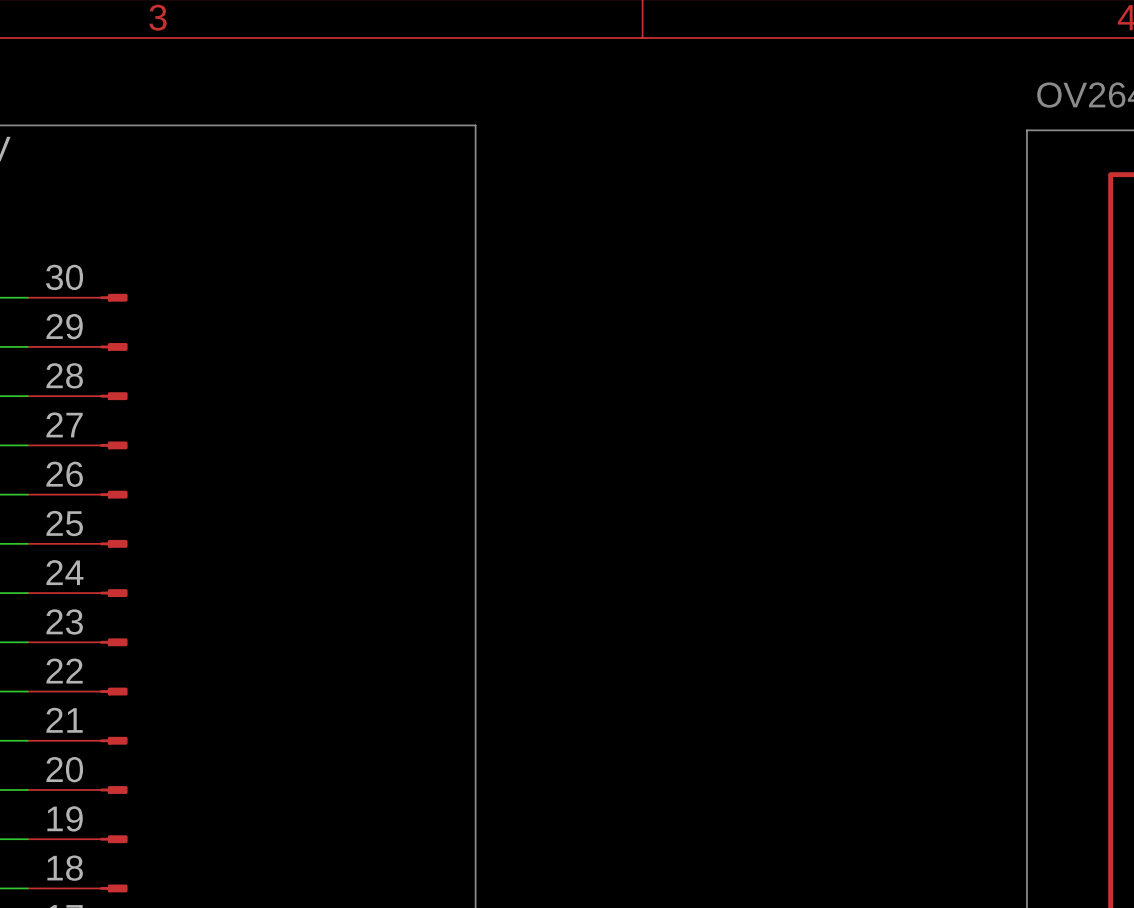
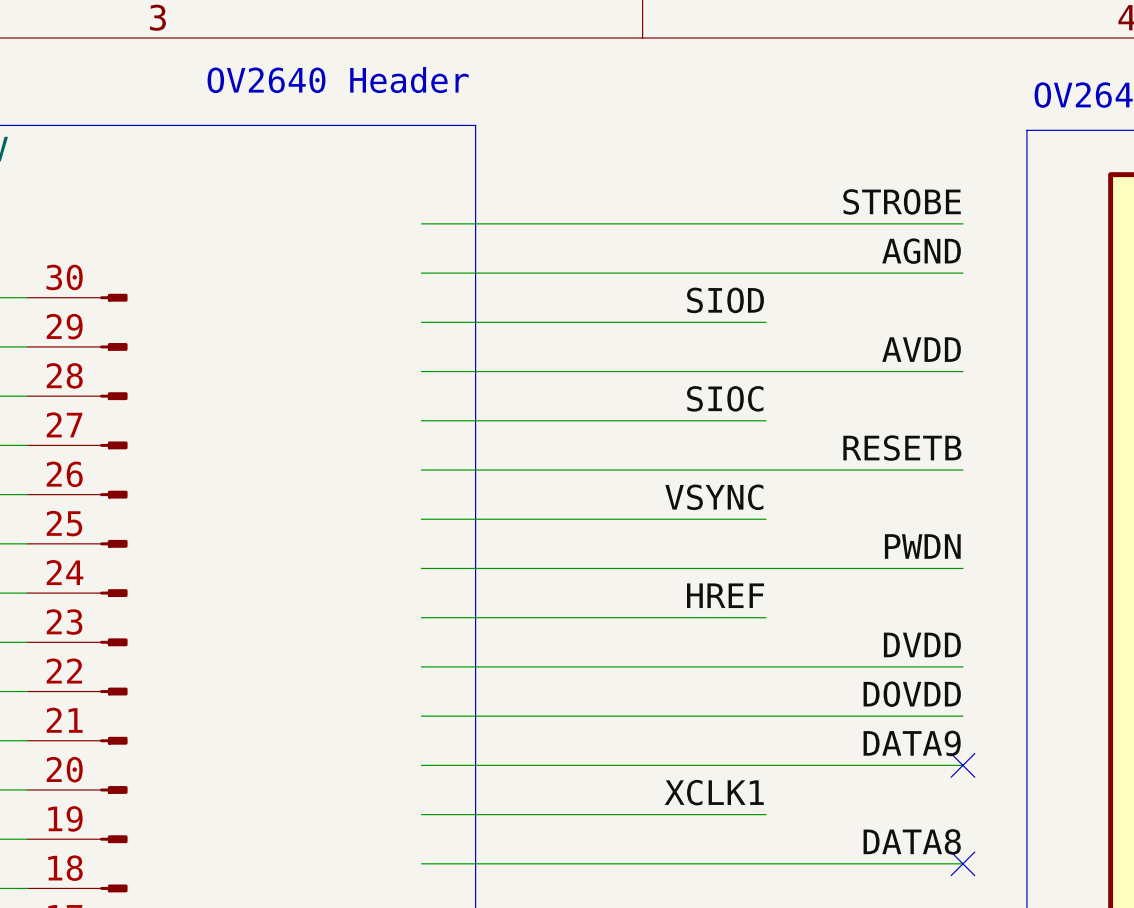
text: none -> OV2640 Header (338, 79)
label: none -> STROBE (902, 201)
wire: none -> (421, 223) (962, 223)
label: none -> AGND (921, 251)
wire: none -> (421, 273) (962, 273)
label: none -> SIOD (725, 300)
wire: none -> (421, 322) (766, 322)
label: none -> AVDD (921, 349)
wire: none -> (421, 371) (962, 371)
label: none -> SIOC (725, 398)
wire: none -> (421, 420) (766, 420)
label: none -> RESETB (902, 448)
wire: none -> (421, 470) (962, 470)
label: none -> VSYNC (714, 497)
wire: none -> (421, 519) (766, 519)
label: none -> PWDN (922, 546)
wire: none -> (421, 568) (962, 568)
label: none -> HREF (725, 595)
wire: none -> (421, 617) (766, 617)
label: none -> DVDD (922, 644)
wire: none -> (421, 666) (962, 666)
label: none -> DOVDD (912, 694)
wire: none -> (421, 716) (962, 716)
label: none -> DATA9 (912, 743)
wire: none -> (421, 765) (962, 765)
no-connect mark: none -> (962, 765)
label: none -> XCLK1 (714, 792)
wire: none -> (421, 814) (766, 814)
label: none -> DATA8 (912, 841)
wire: none -> (421, 863) (962, 863)
no-connect mark: none -> (962, 863)

